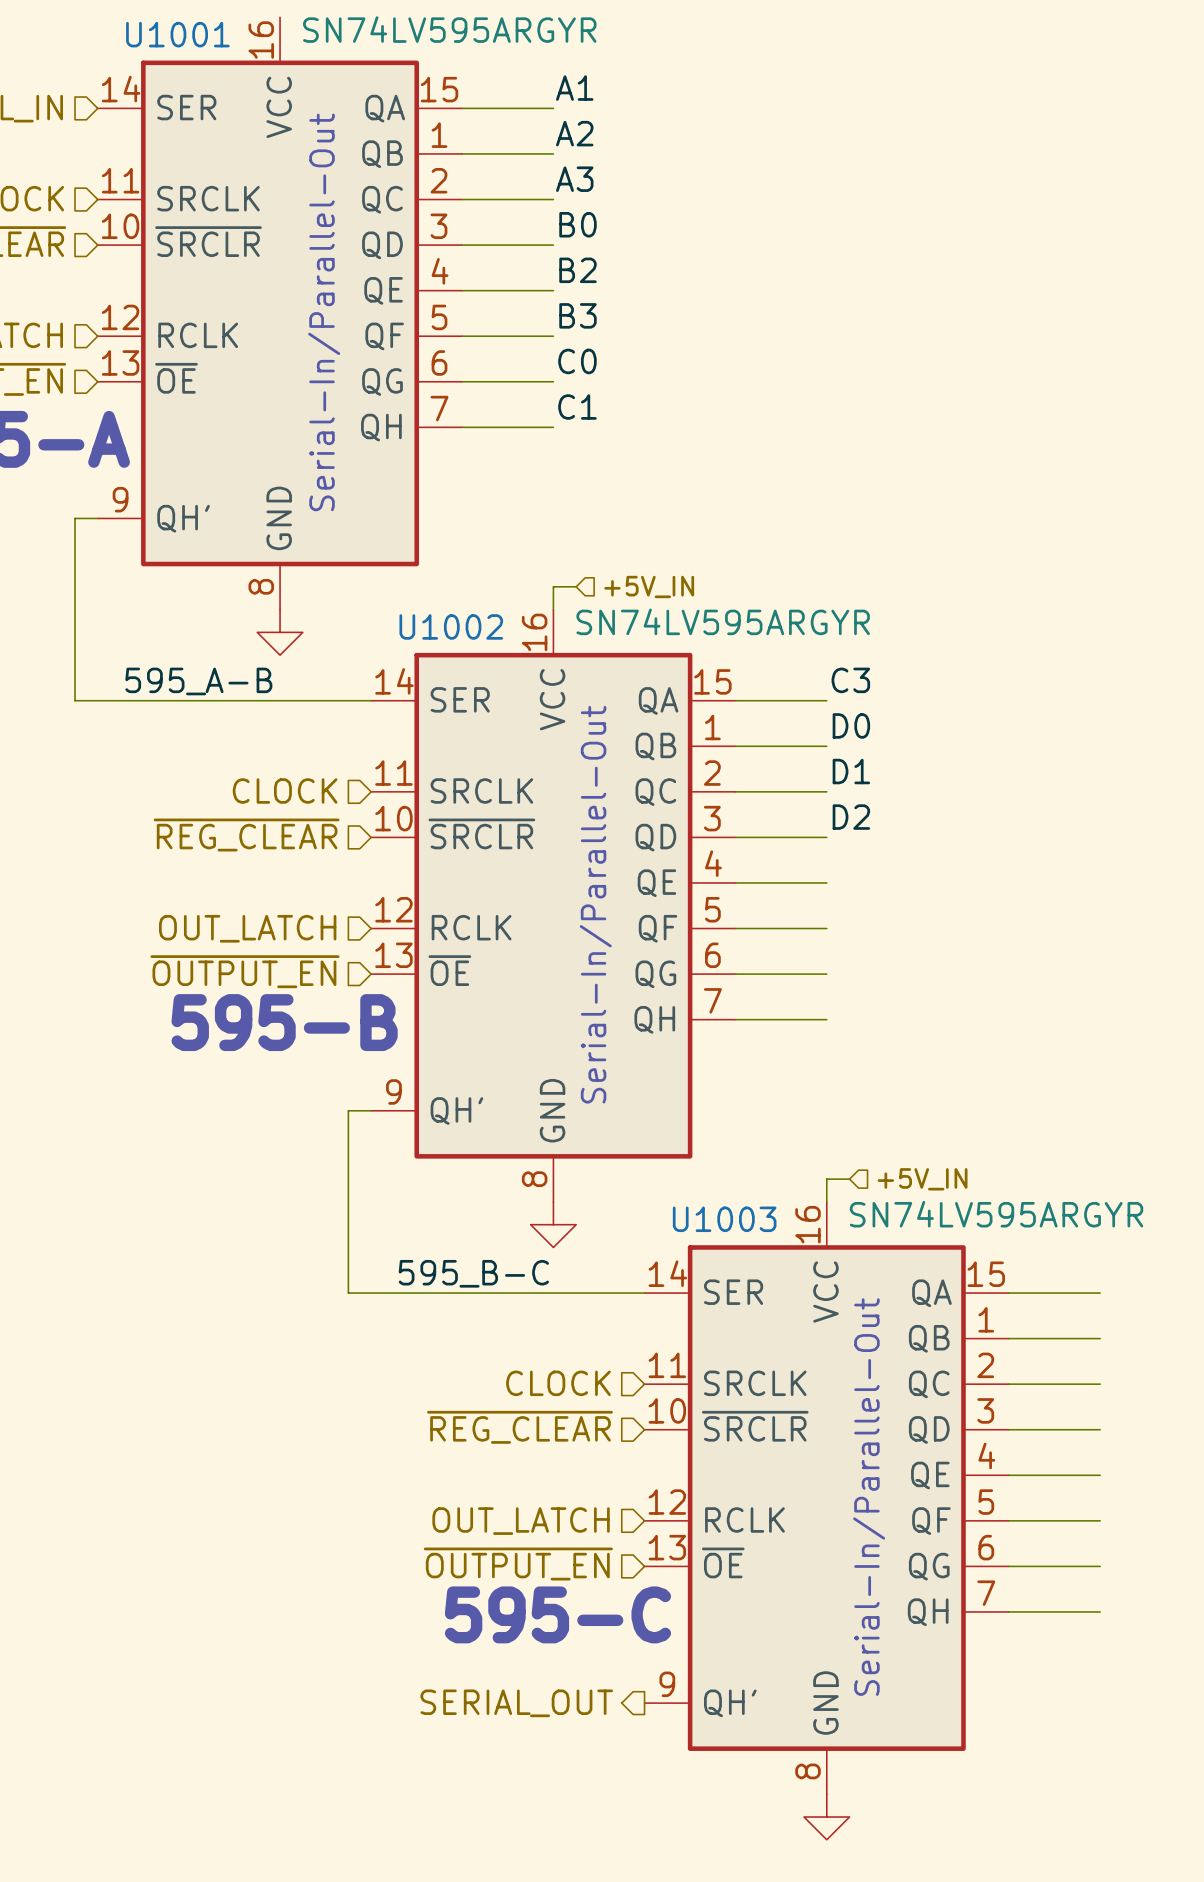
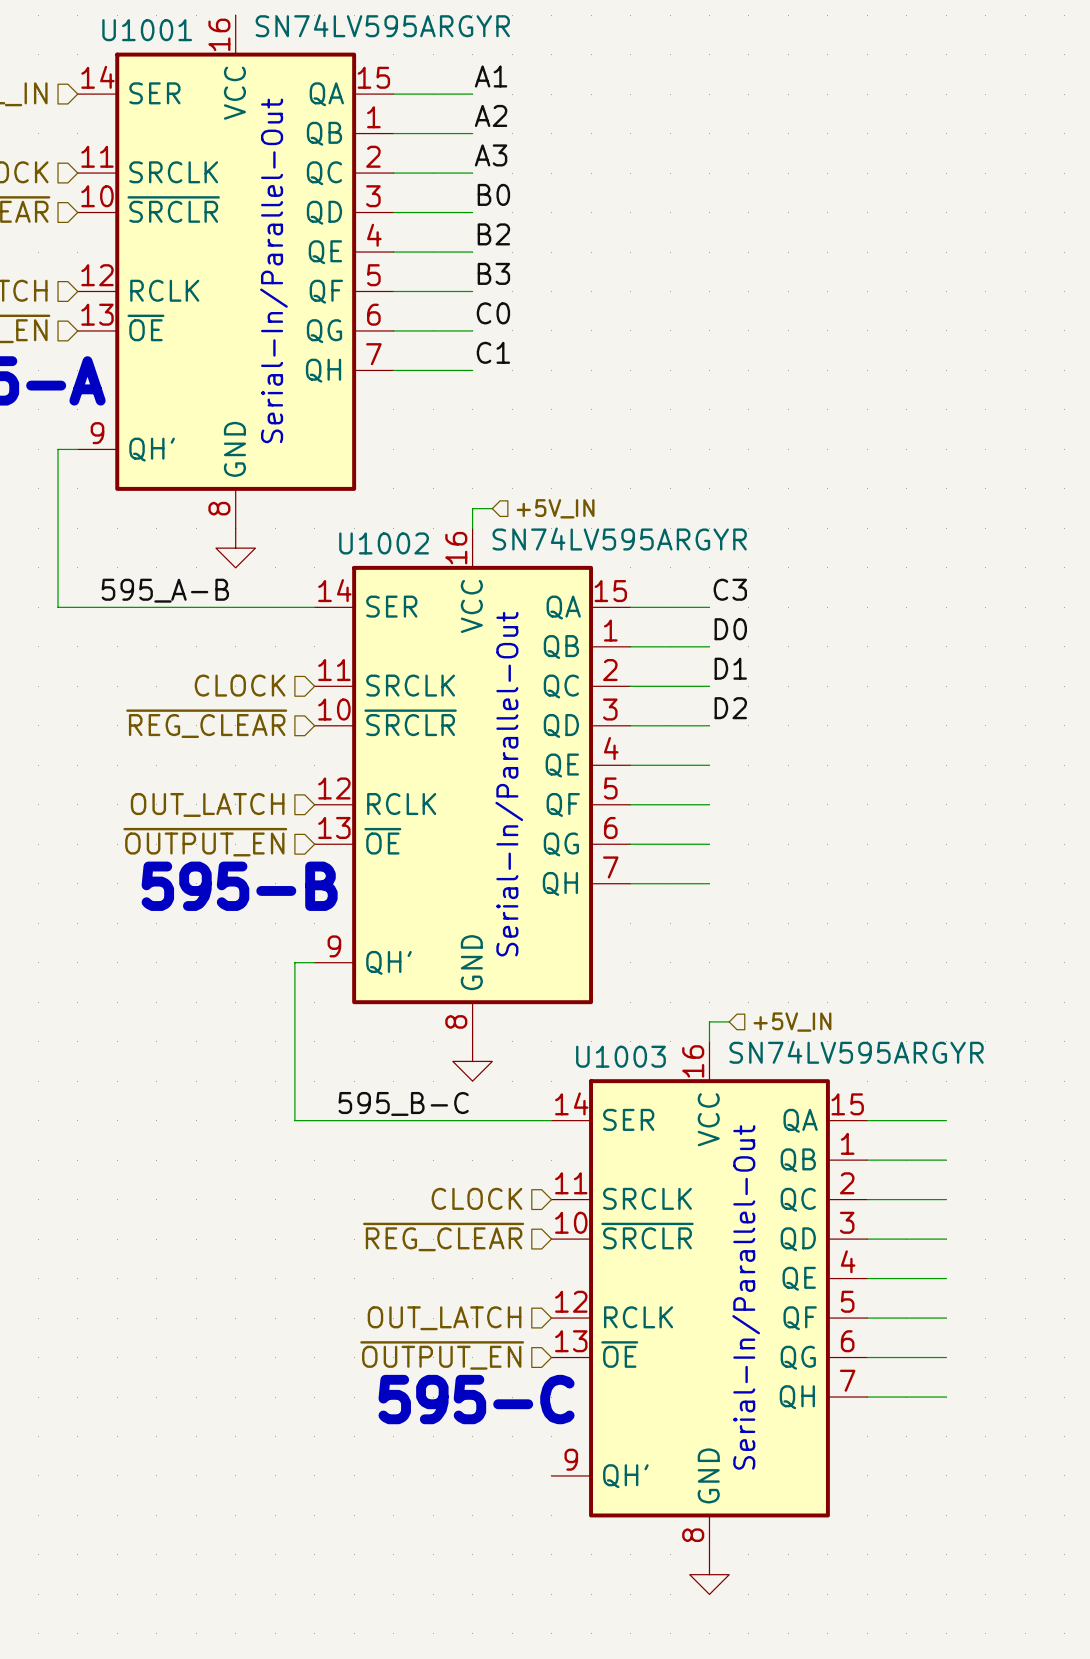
hierarchical label: SERIAL_OUT (516, 1703) -> none

